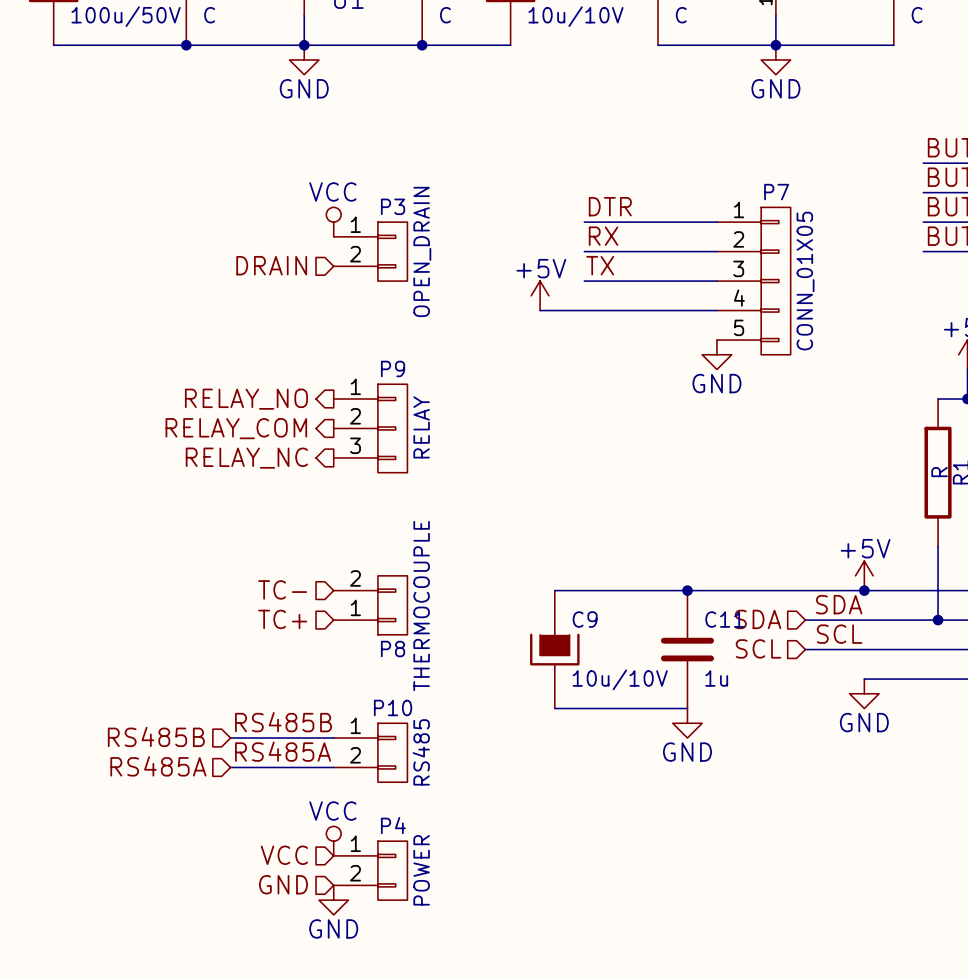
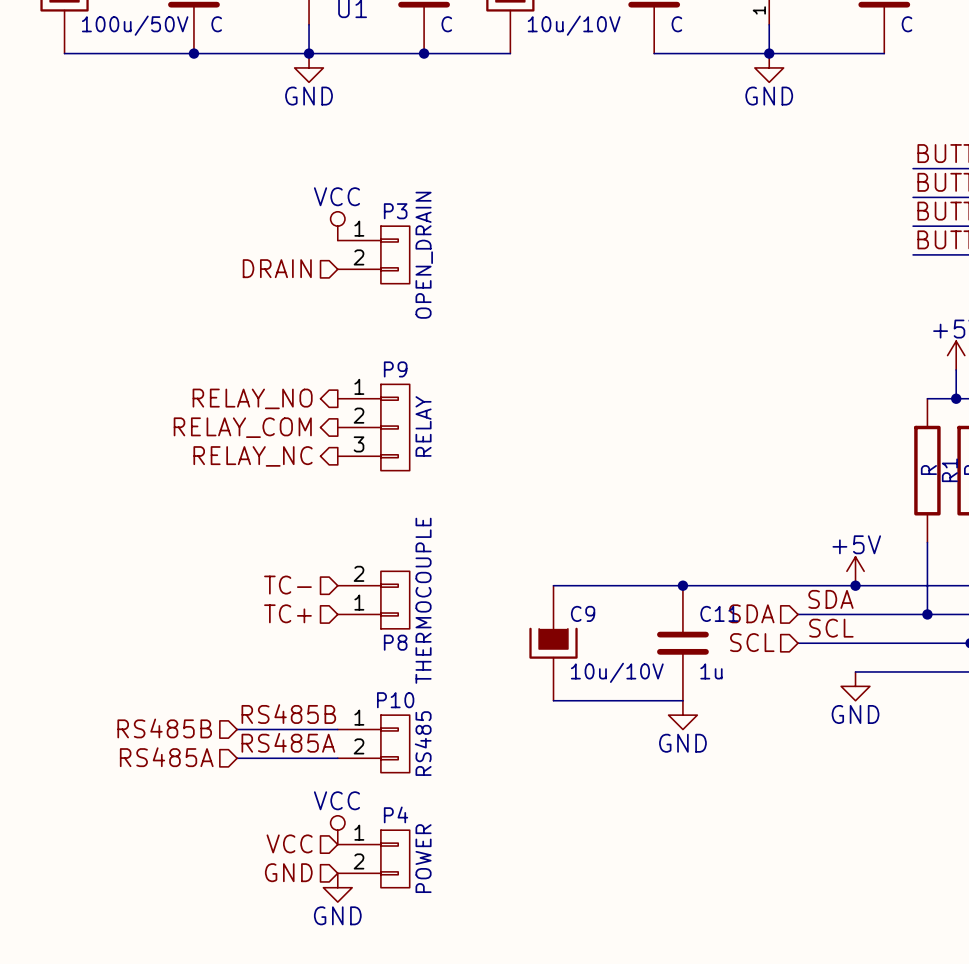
label: DTR (610, 206) -> none
wire: (584, 222) (716, 222) -> none
label: RX (603, 236) -> none
wire: (584, 251) (716, 251) -> none
label: TX (600, 265) -> none
wire: (584, 281) (716, 281) -> none
P7: CONN_01X05 (753, 281) -> none
power symbol: +5V (540, 295) -> none
wire: (540, 310) (716, 310) -> none
power symbol: GND (716, 354) -> none

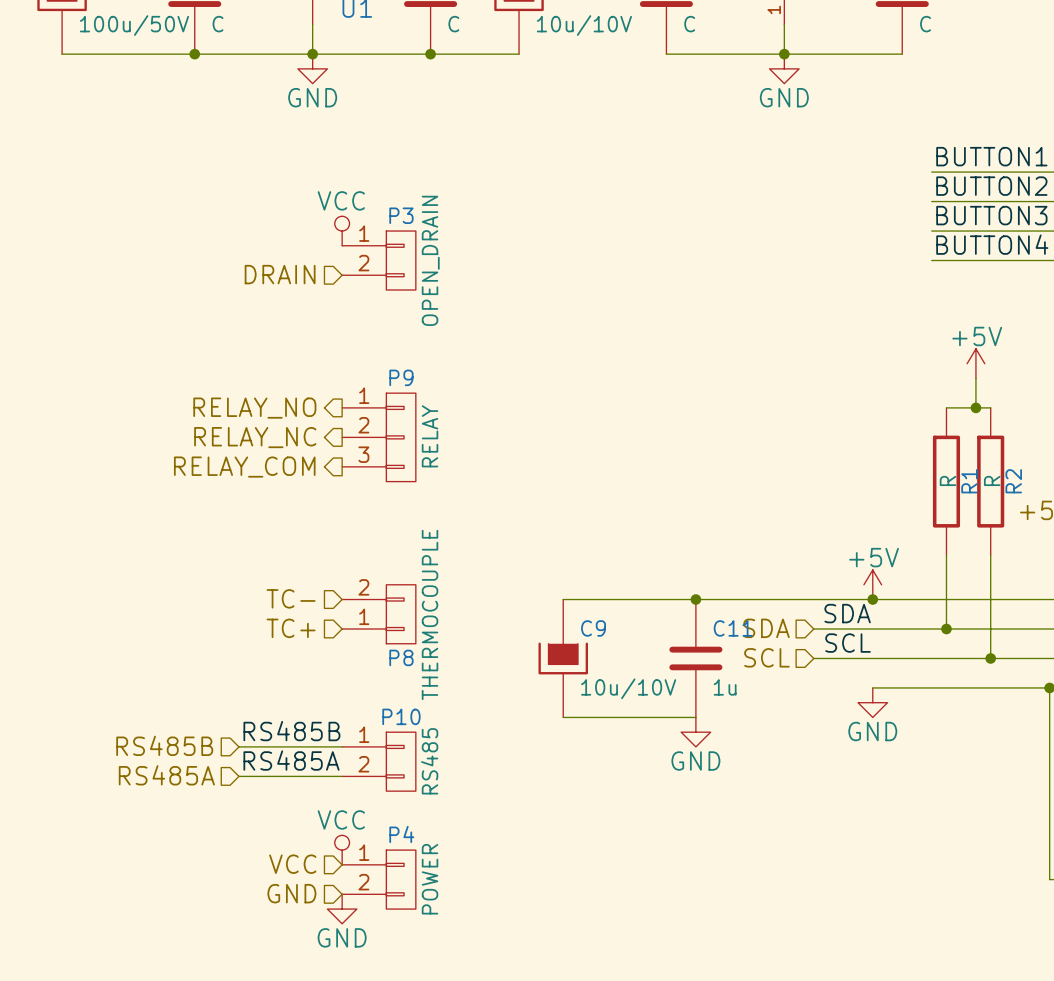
hierarchical label: RELAY_COM (242, 427) -> RELAY_NC (255, 437)
hierarchical label: RELAY_NC (253, 456) -> RELAY_COM (244, 467)

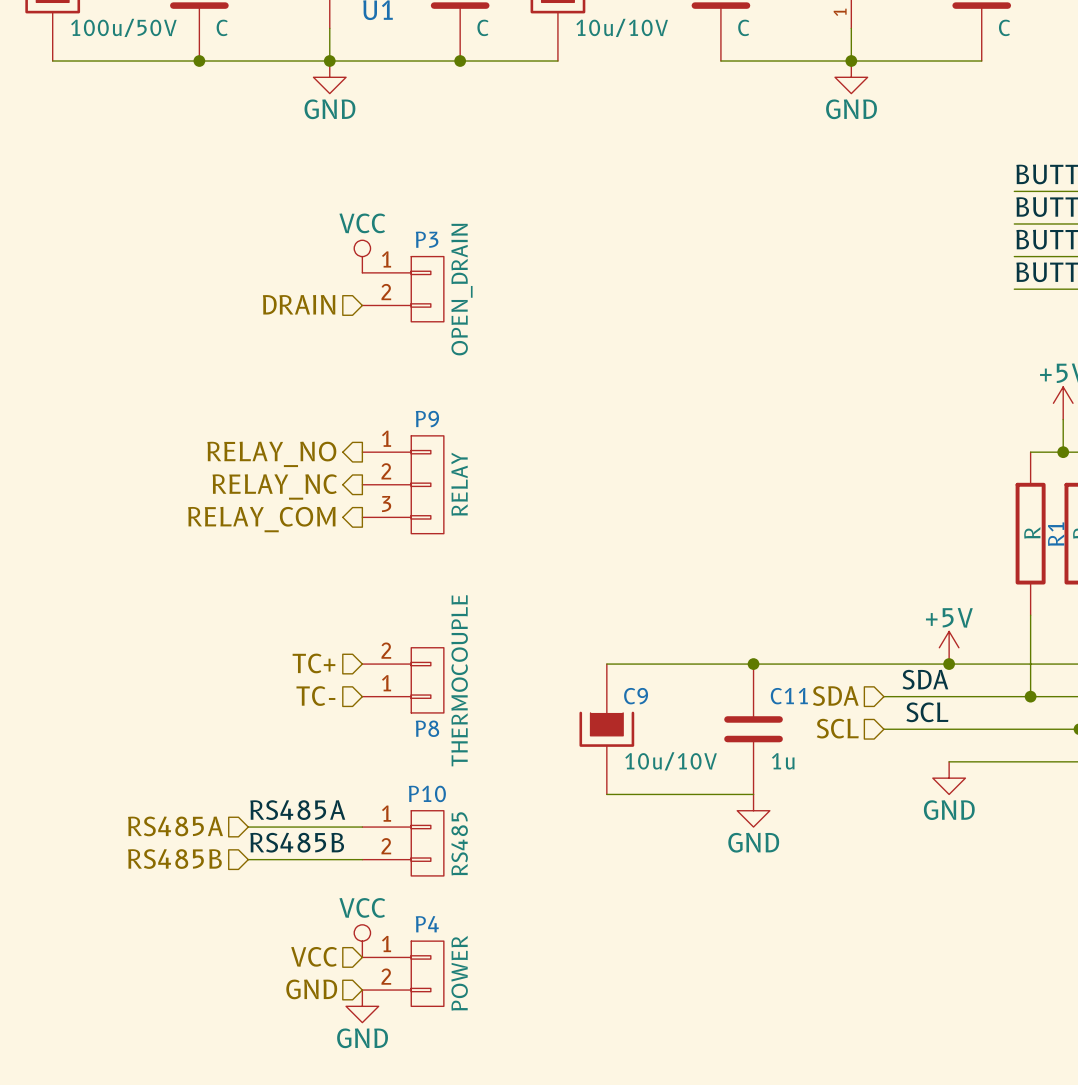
hierarchical label: TC- (291, 598) -> TC+ (313, 663)
hierarchical label: TC+ (291, 628) -> TC- (315, 696)
label: RS485B (291, 731) -> RS485A (297, 810)
hierarchical label: RS485B (164, 745) -> RS485A (175, 826)
label: RS485A (291, 760) -> RS485B (297, 842)
hierarchical label: RS485A (166, 775) -> RS485B (174, 859)

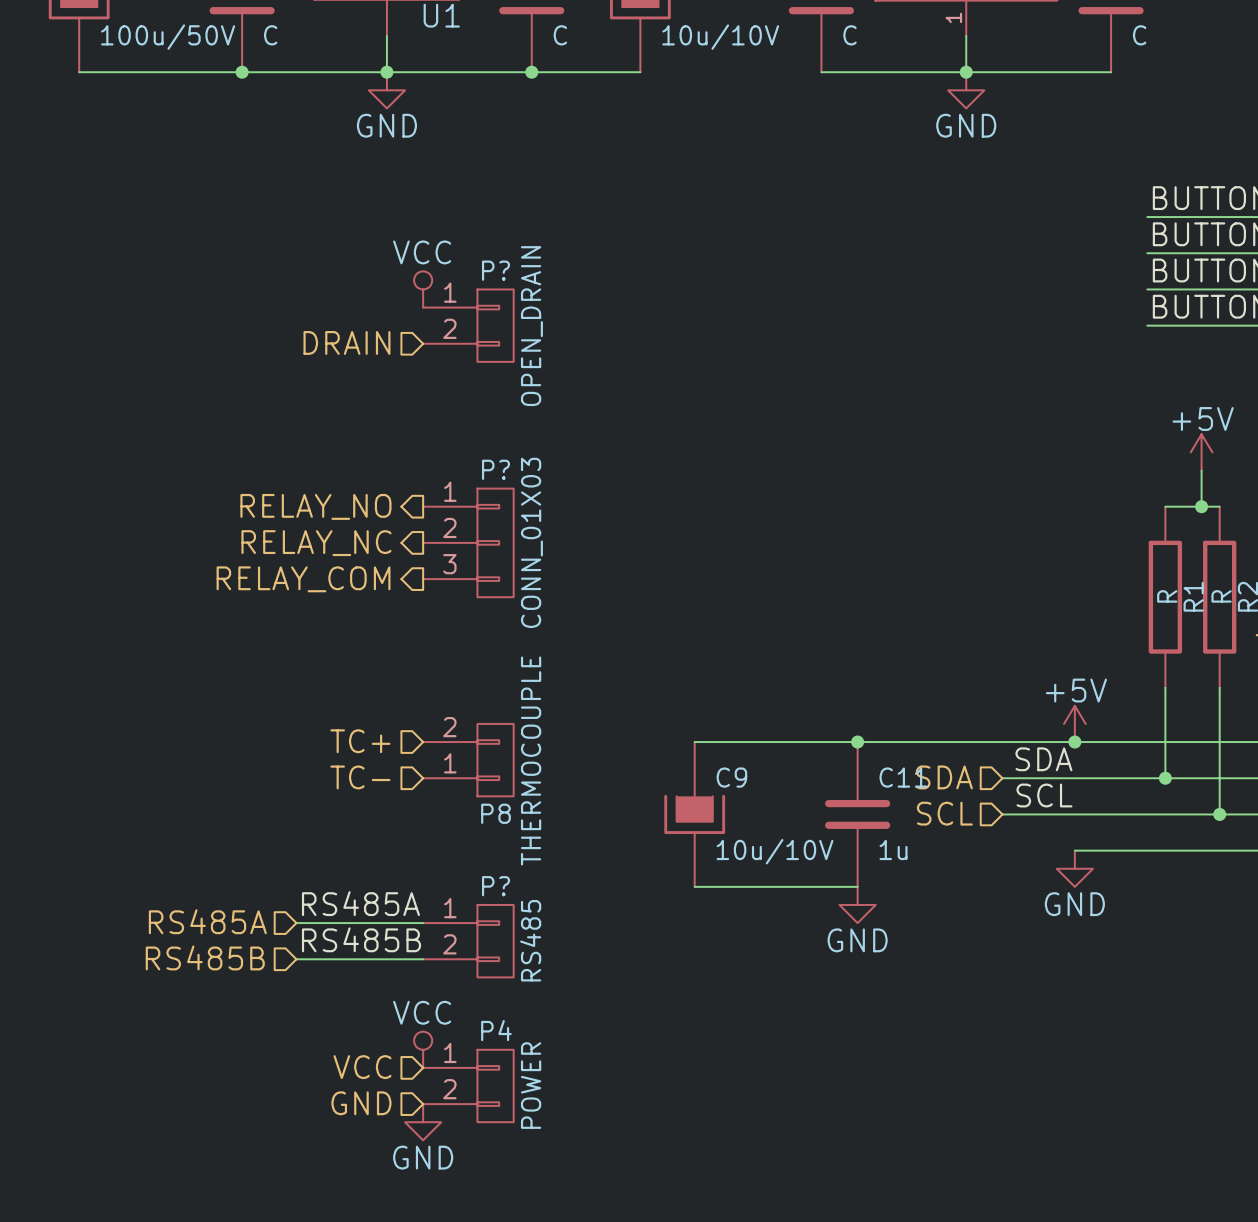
P3 name: P3 (427, 239) -> P? (495, 270)
P9 name: P9 (427, 419) -> P? (495, 469)
P9 value: RELAY (459, 484) -> CONN_01X03 (531, 542)
P10 name: P10 (427, 793) -> P? (495, 886)

